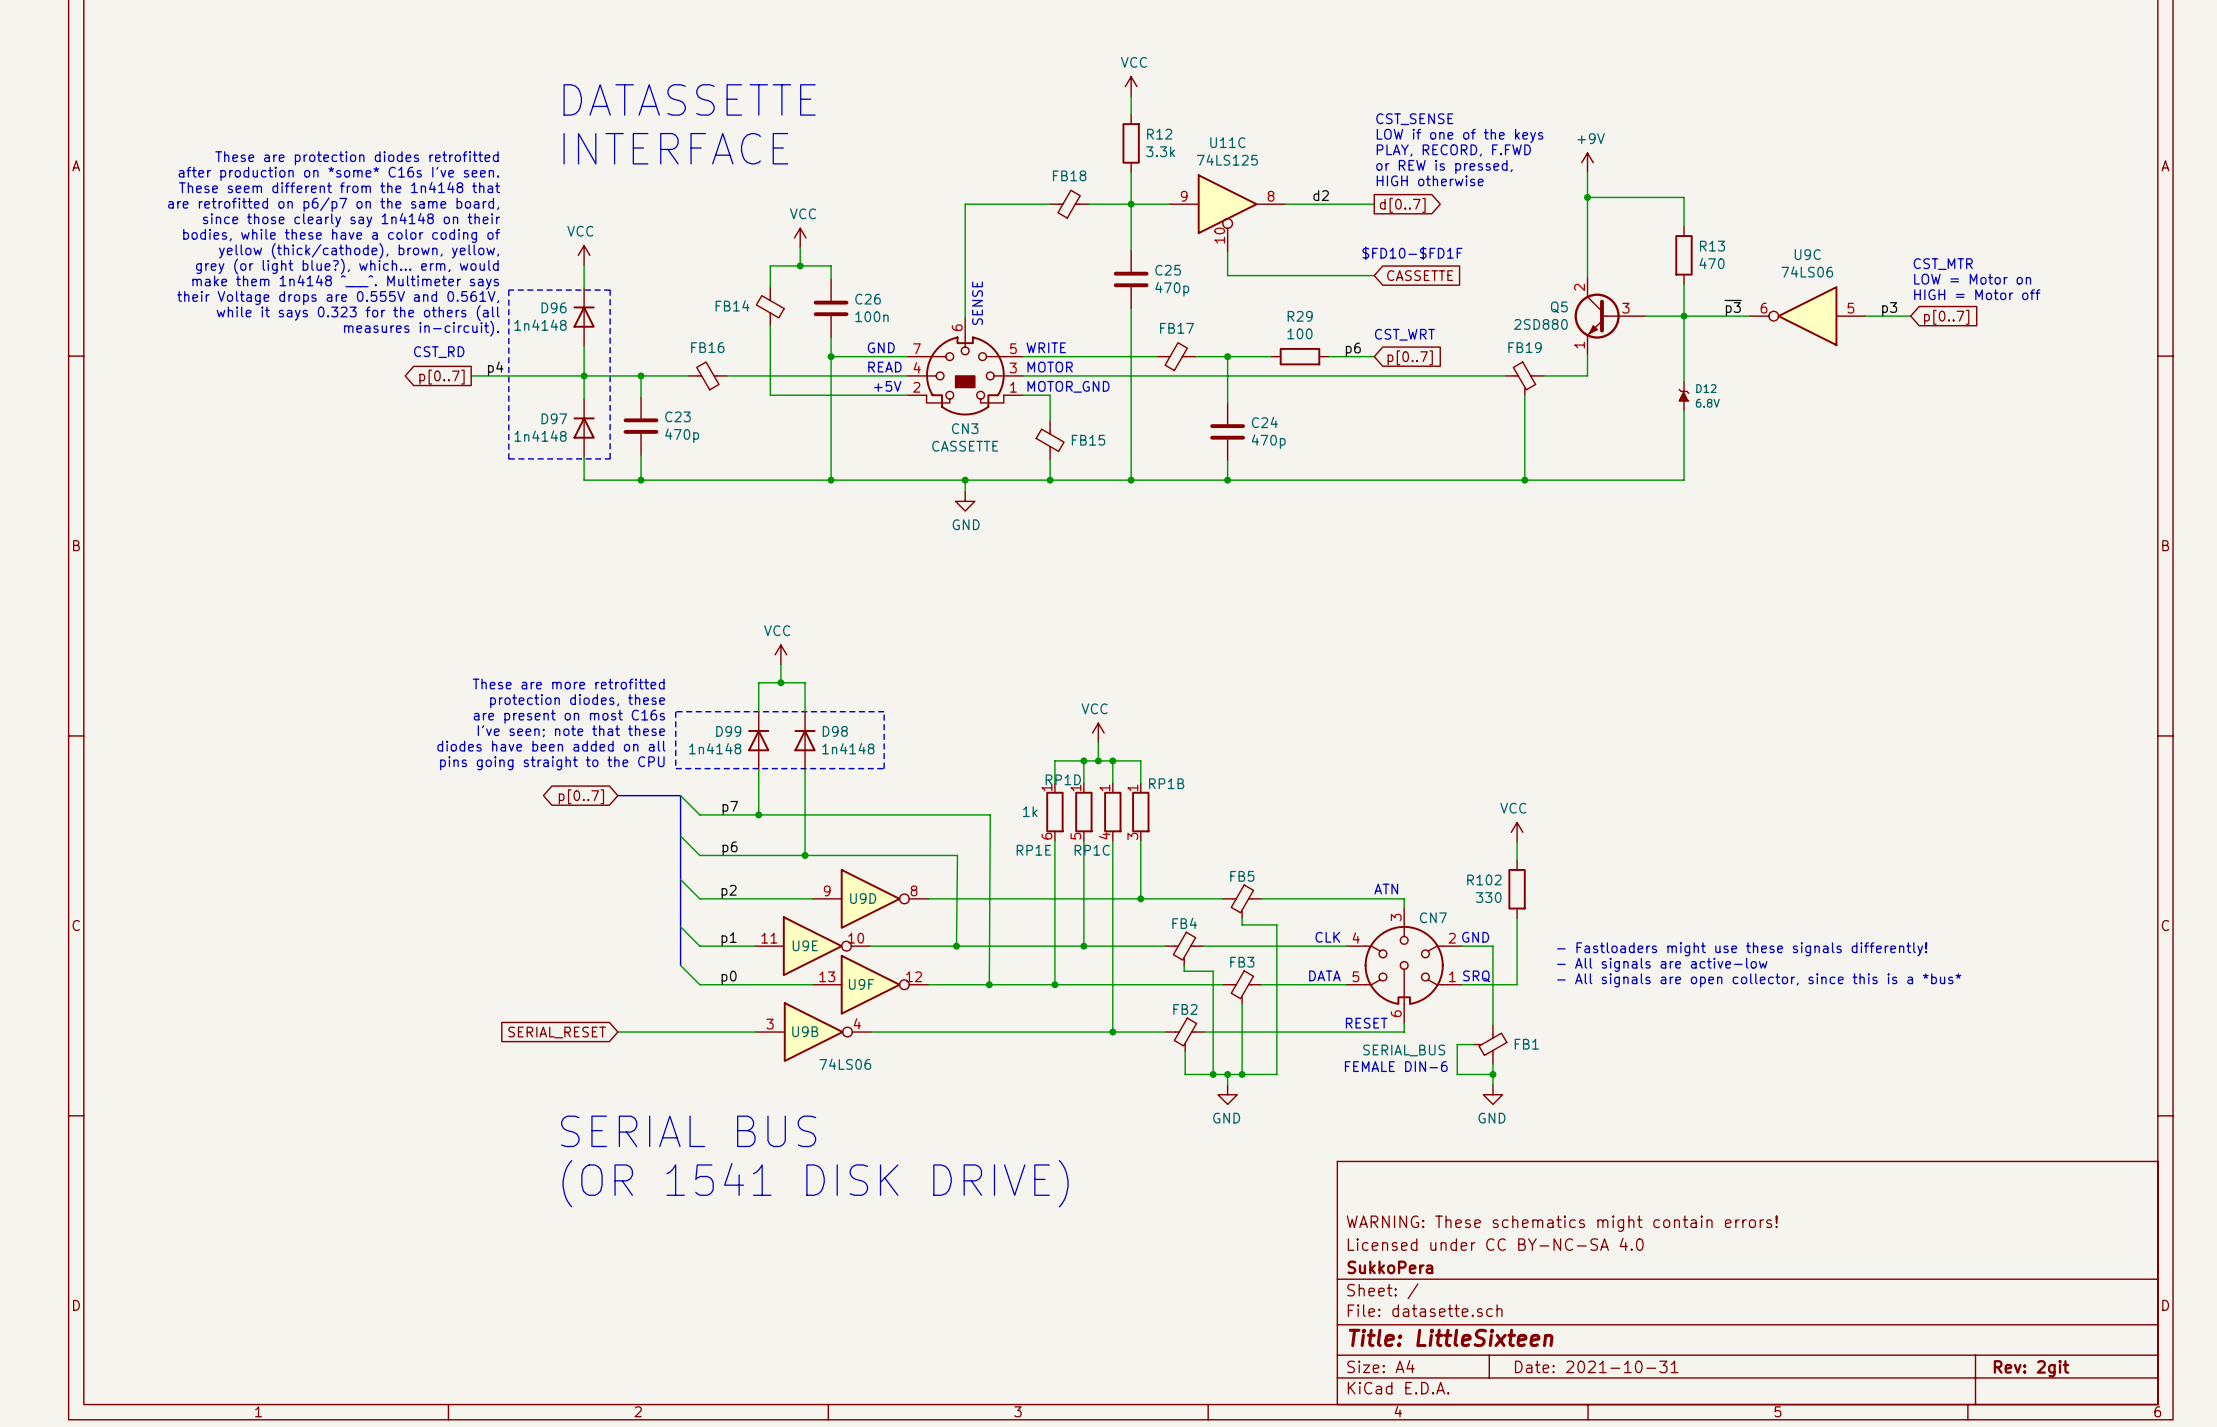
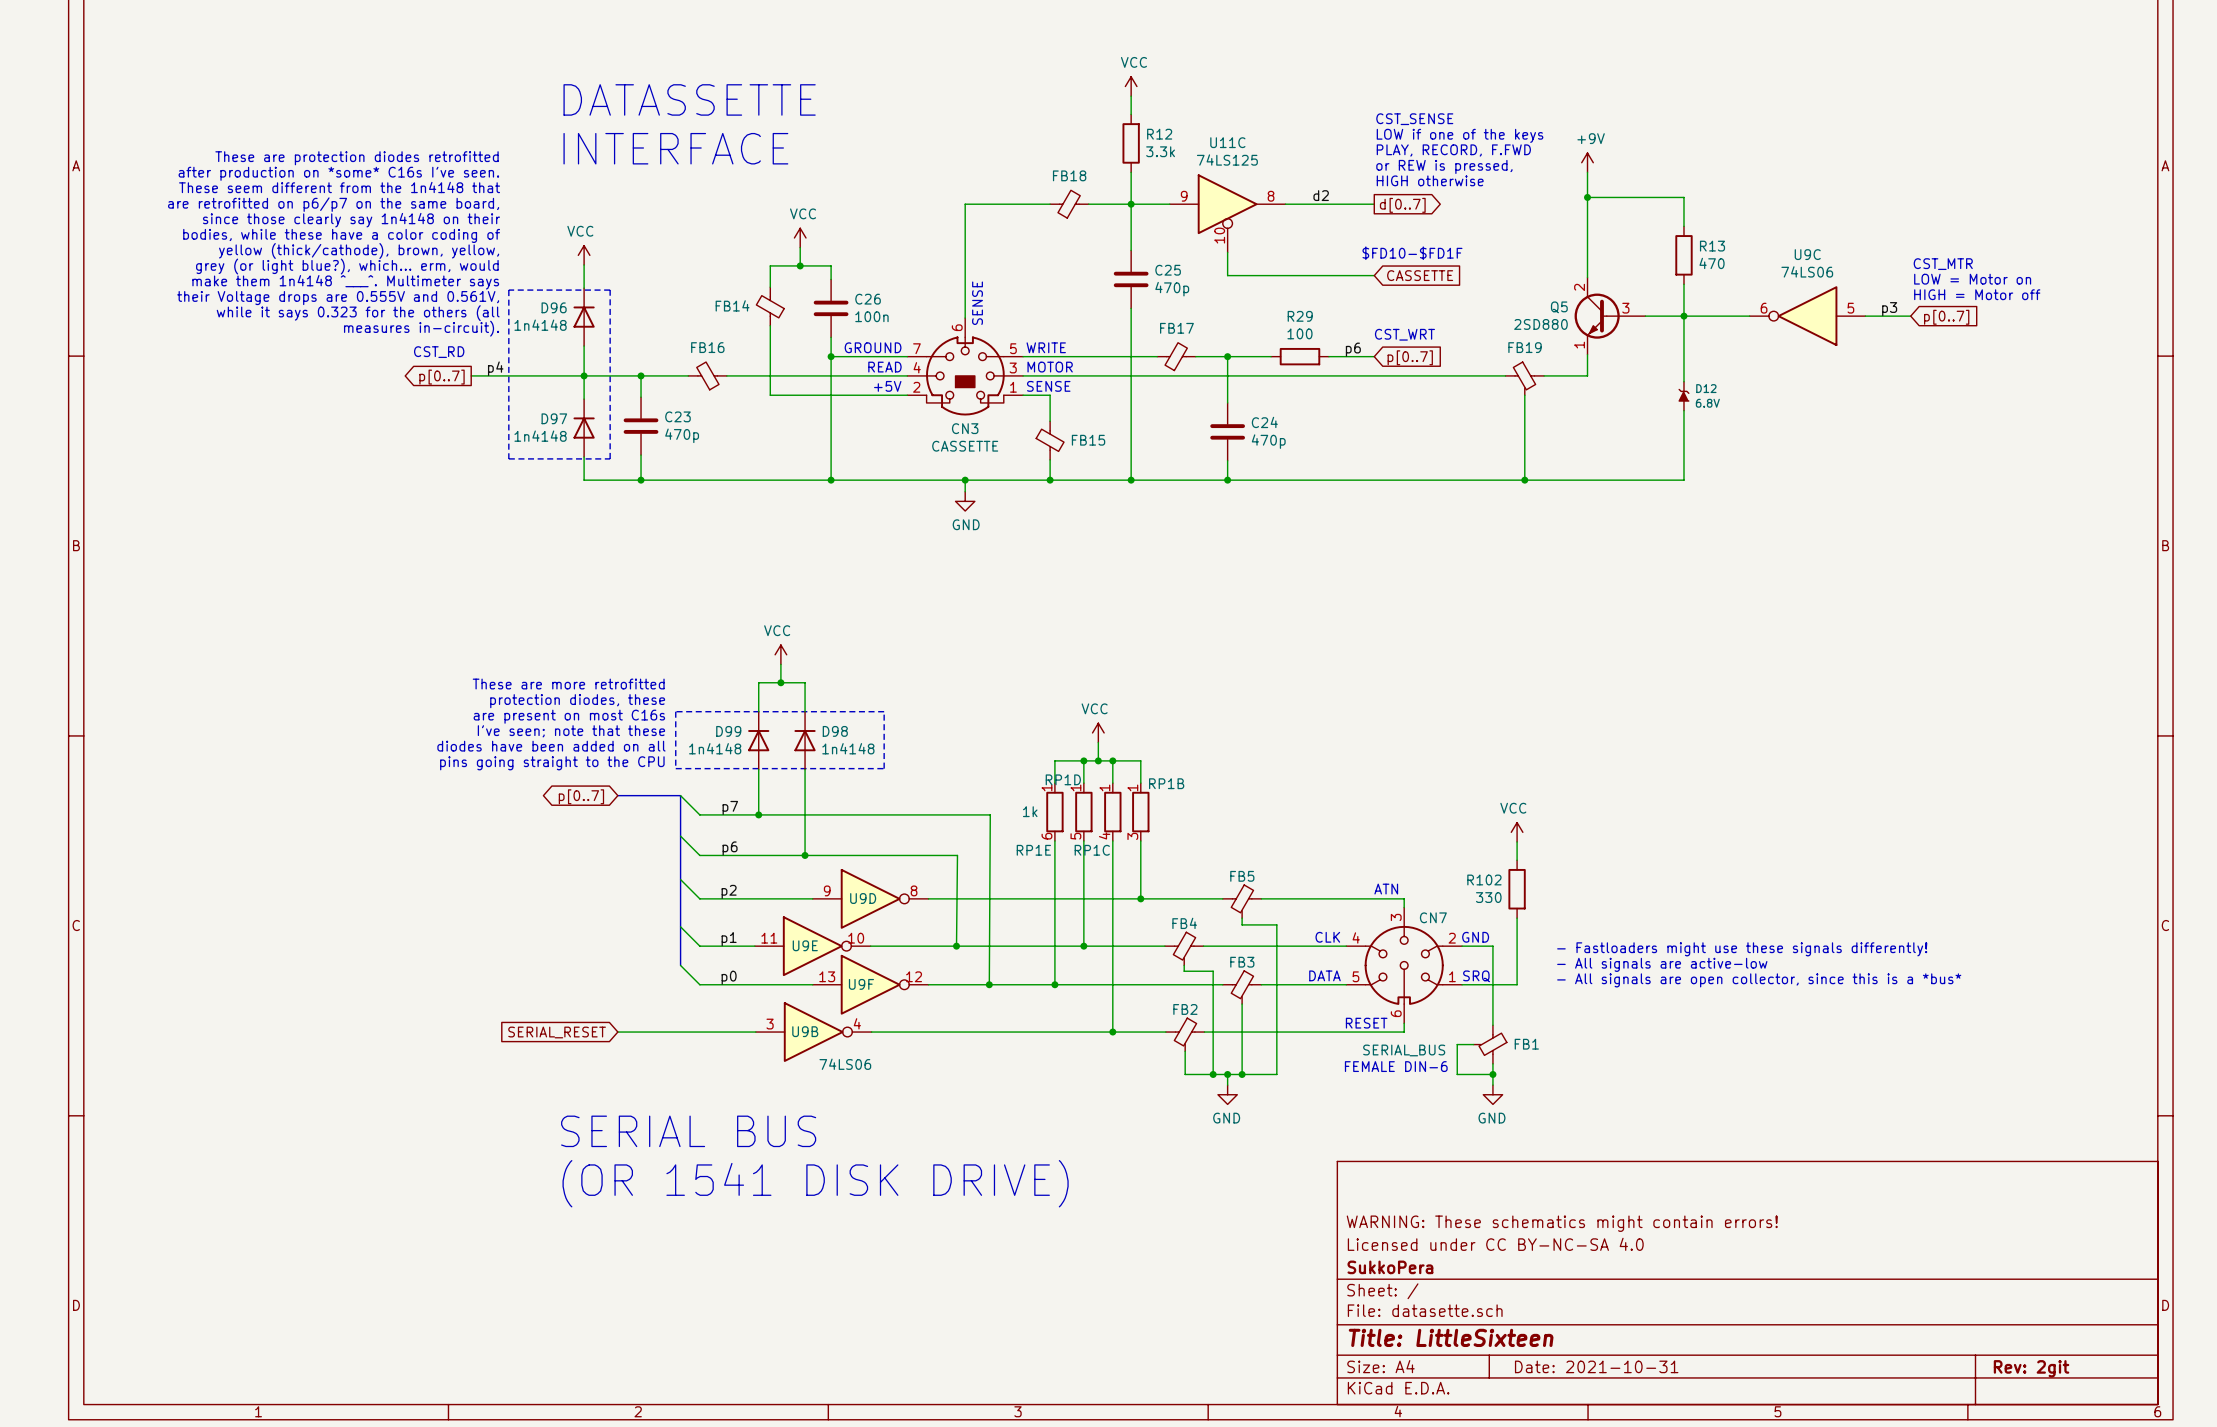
label: ~{p3} (1733, 308) -> none
text: GND (881, 347) -> GROUND (873, 347)
text: MOTOR_GND (1068, 386) -> SENSE (1048, 386)

